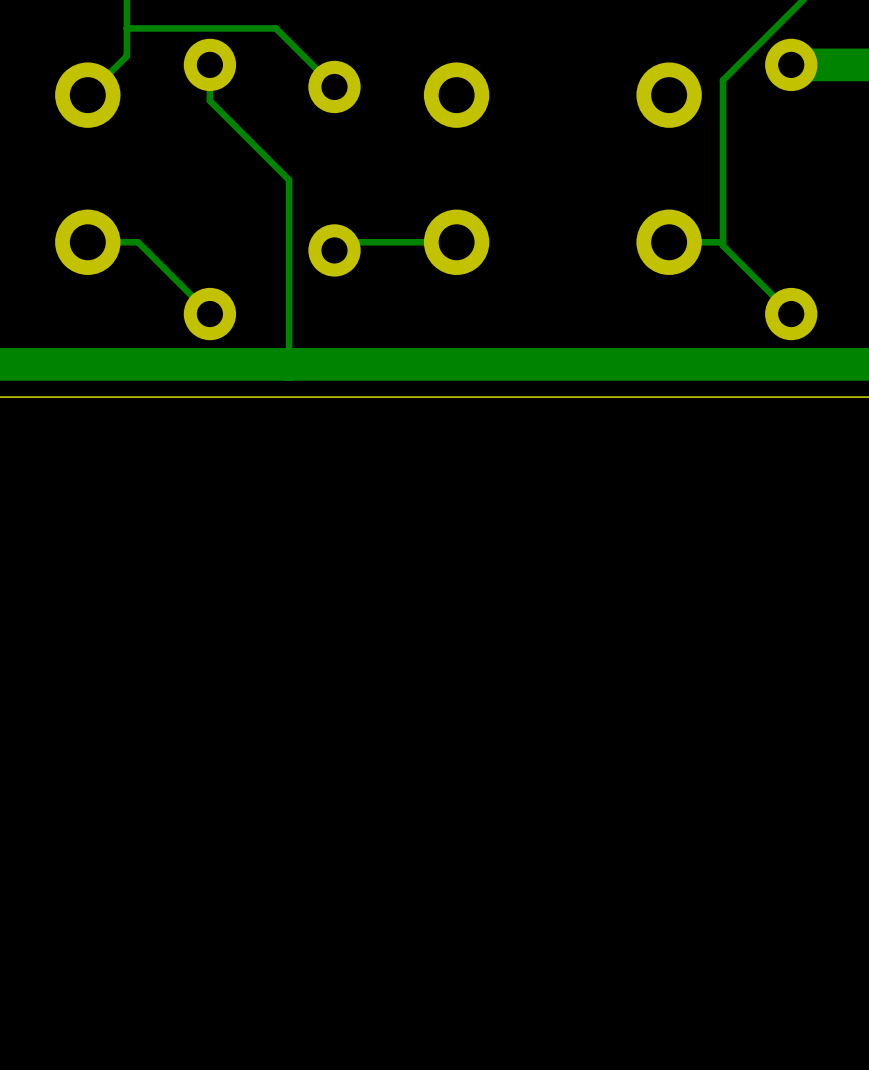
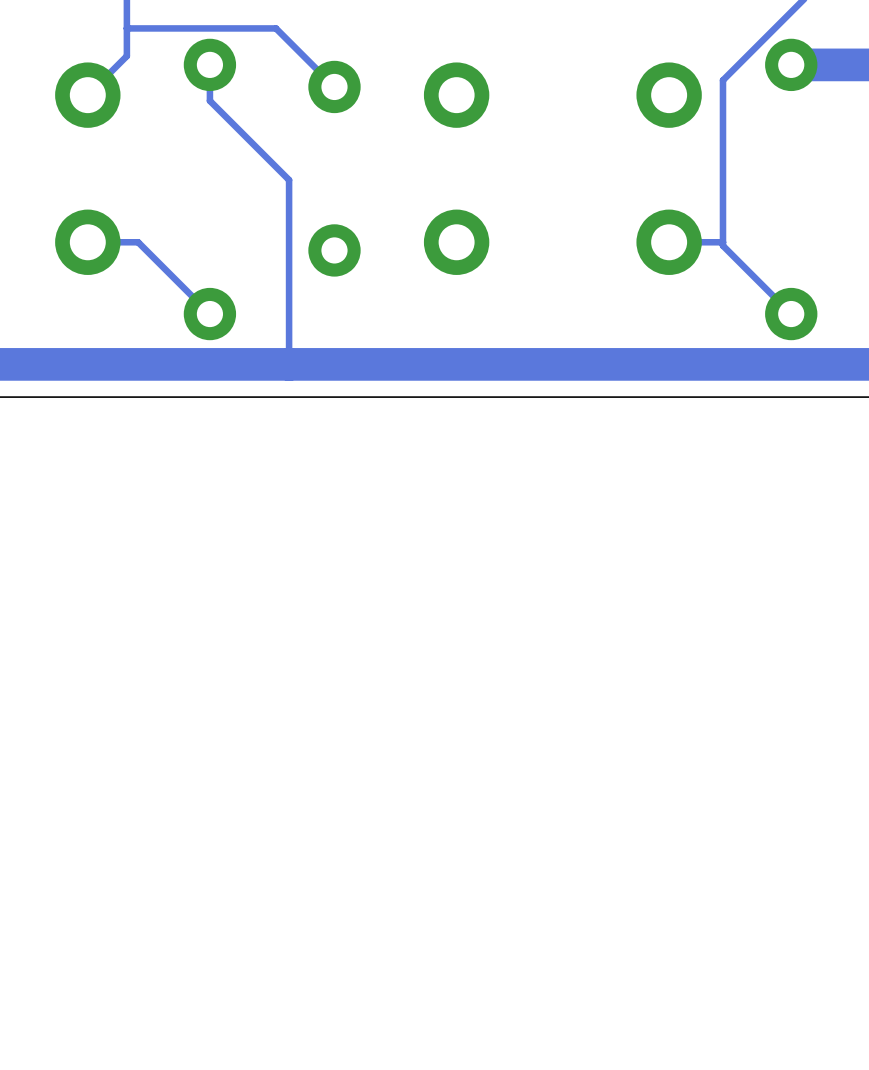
track: (456, 242) (342, 242) (334, 250) -> none

